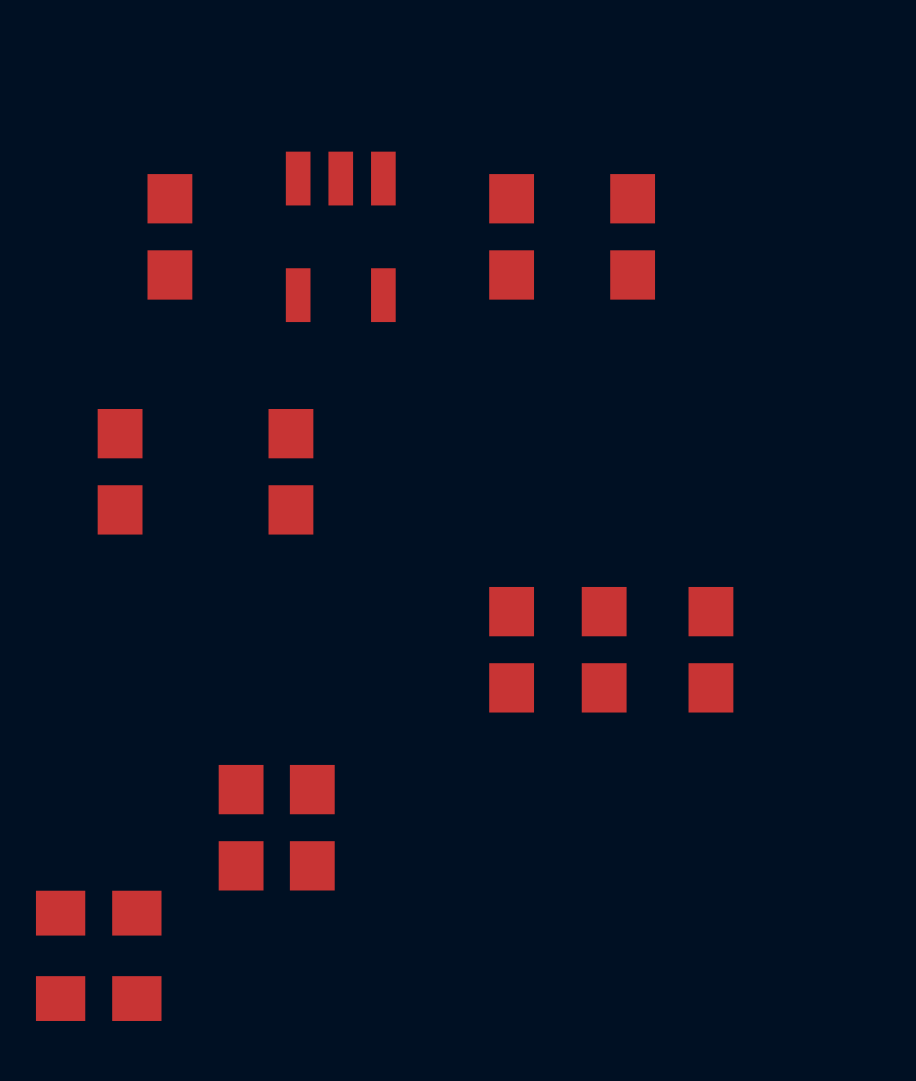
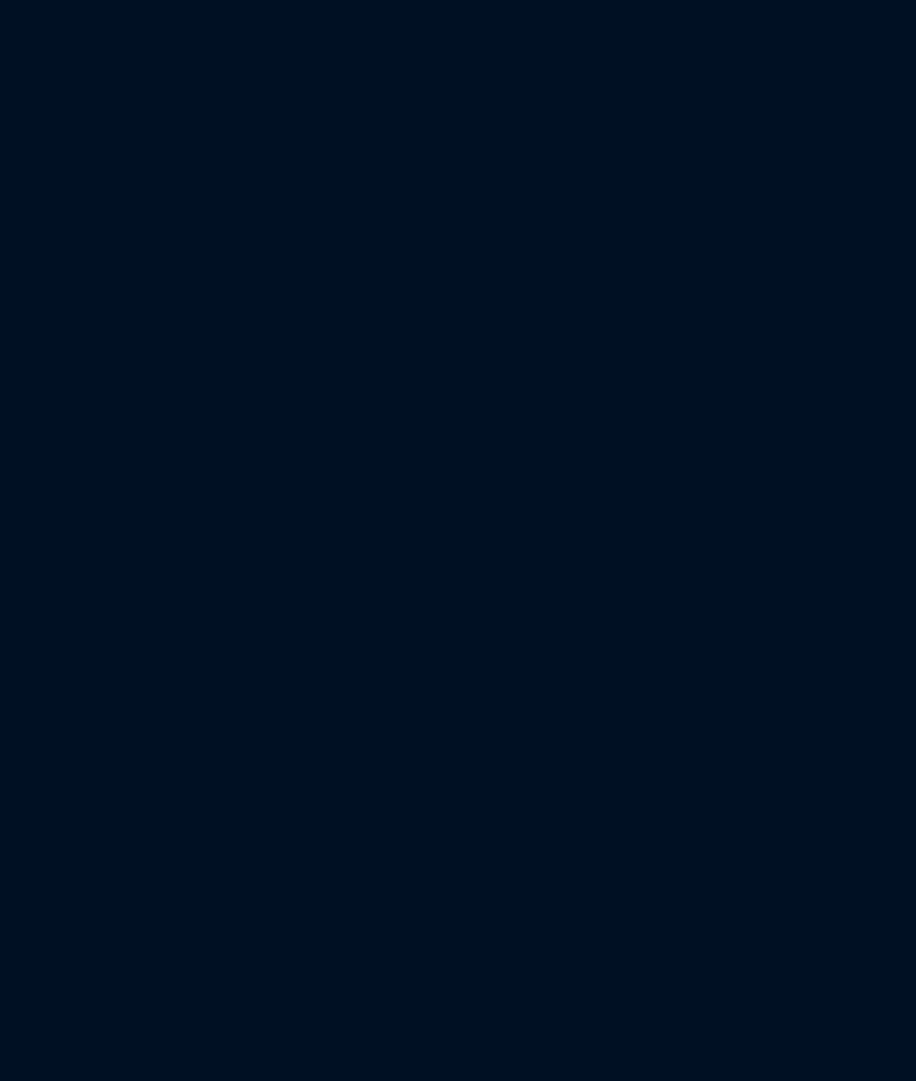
part: (169, 236) -> none
part: (340, 236) -> none
part: (511, 236) -> none
part: (632, 236) -> none
part: (120, 471) -> none
part: (290, 471) -> none
part: (511, 649) -> none
part: (604, 649) -> none
part: (710, 649) -> none
part: (241, 827) -> none
part: (312, 827) -> none
part: (98, 913) -> none
part: (98, 998) -> none

